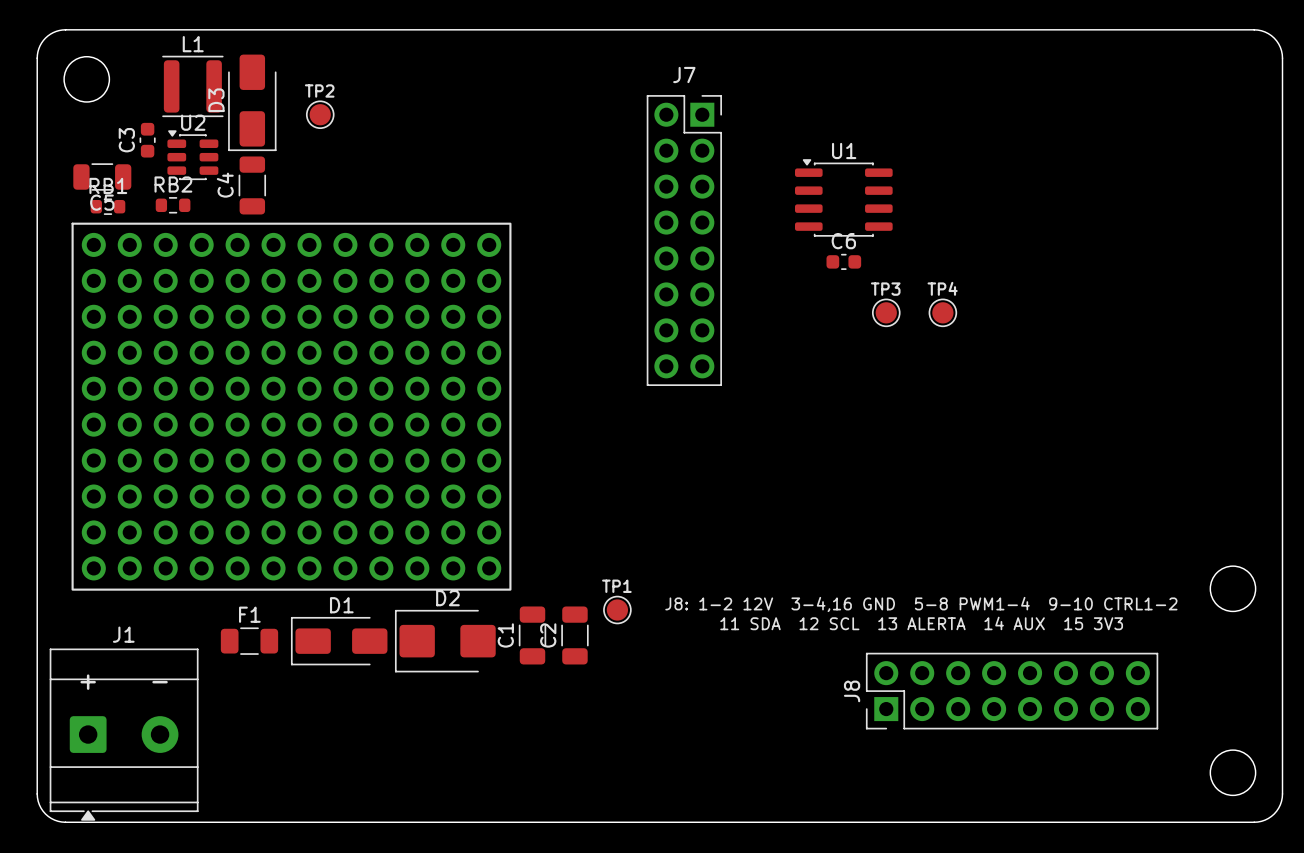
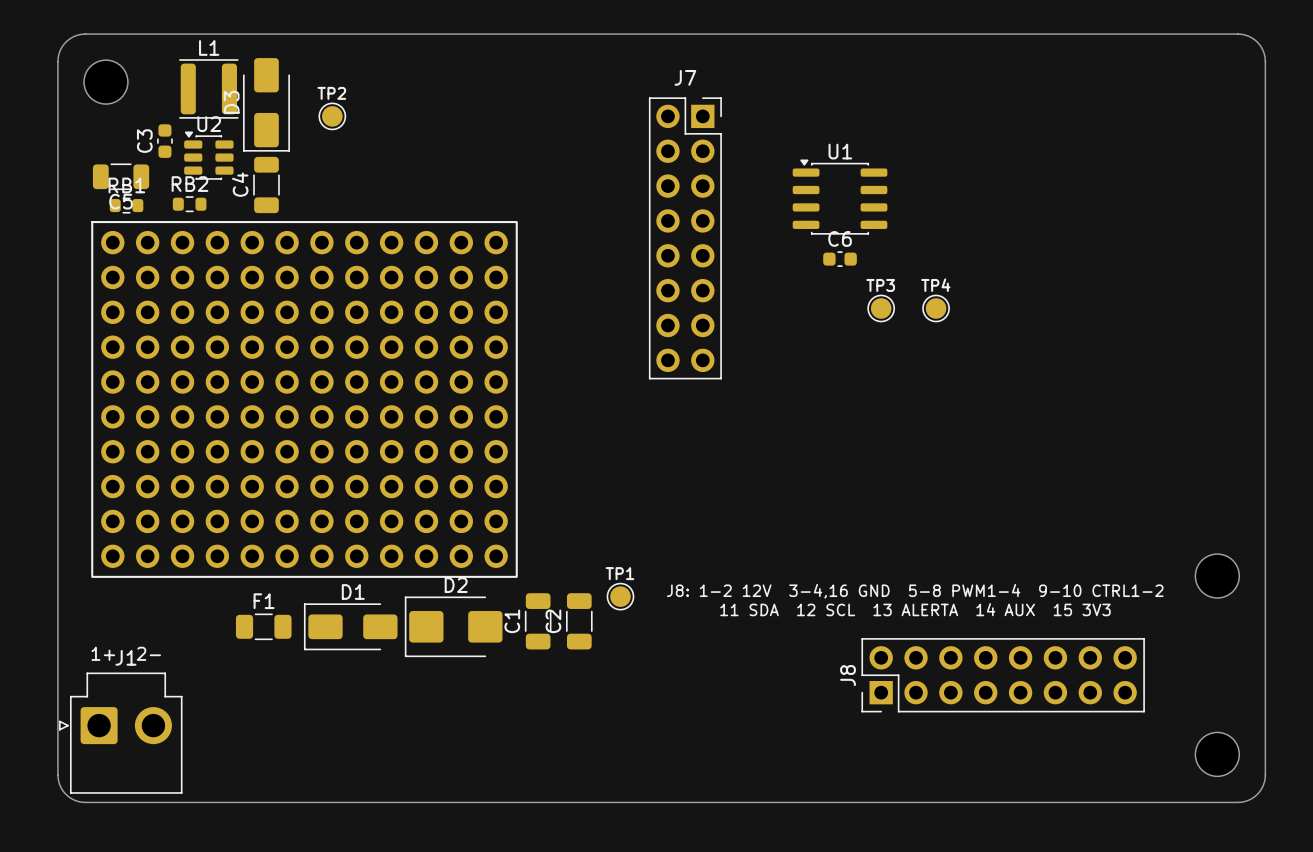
J1 footprint: [49, 648, 199, 821] -> [59, 672, 183, 794]
text: none -> 1+ 2- (126, 653)
text: + (88, 682) -> none
text: - (160, 682) -> none

